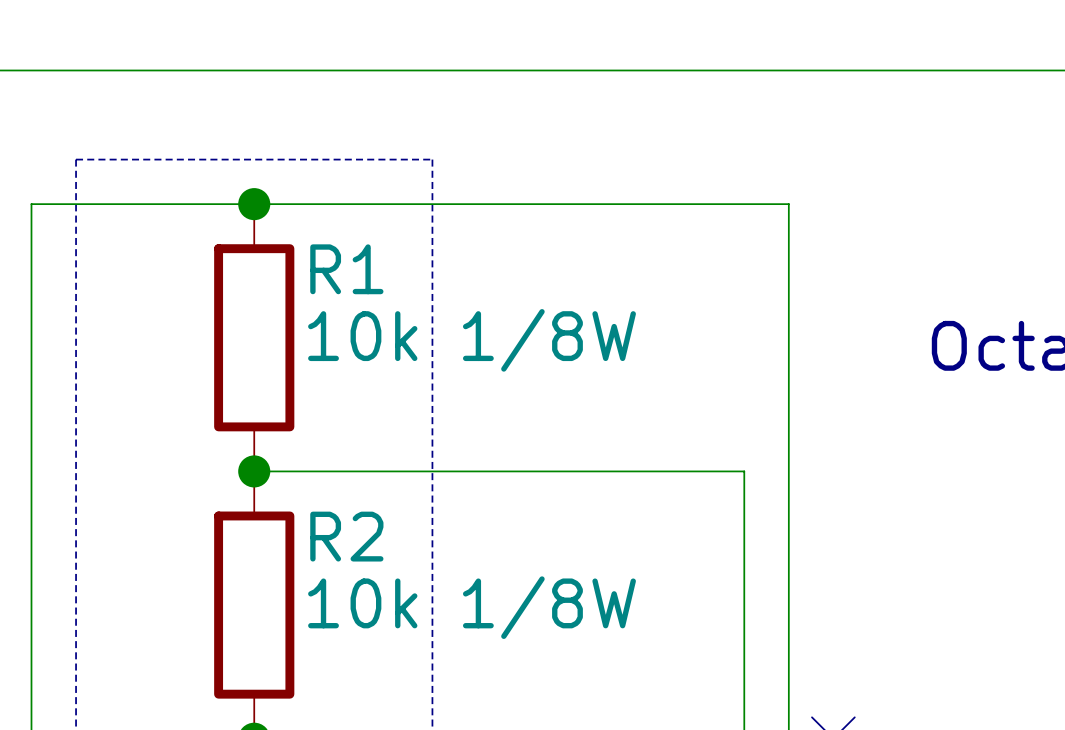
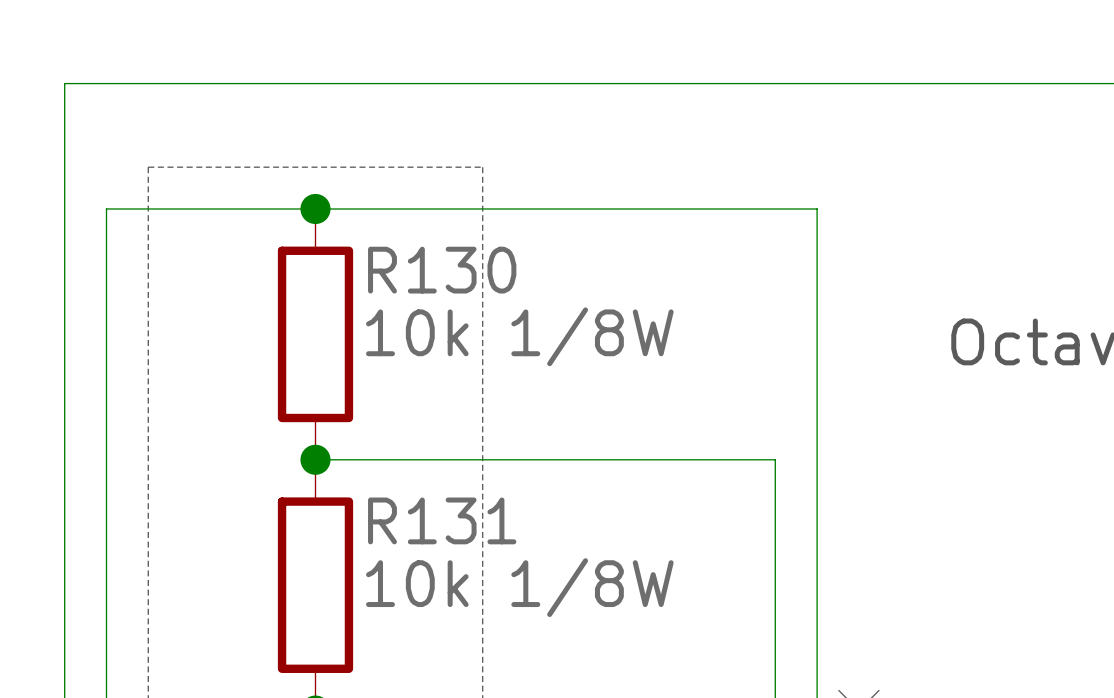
R1 name: R1 (346, 269) -> R130 (442, 270)
R2 name: R2 (346, 536) -> R131 (442, 520)

